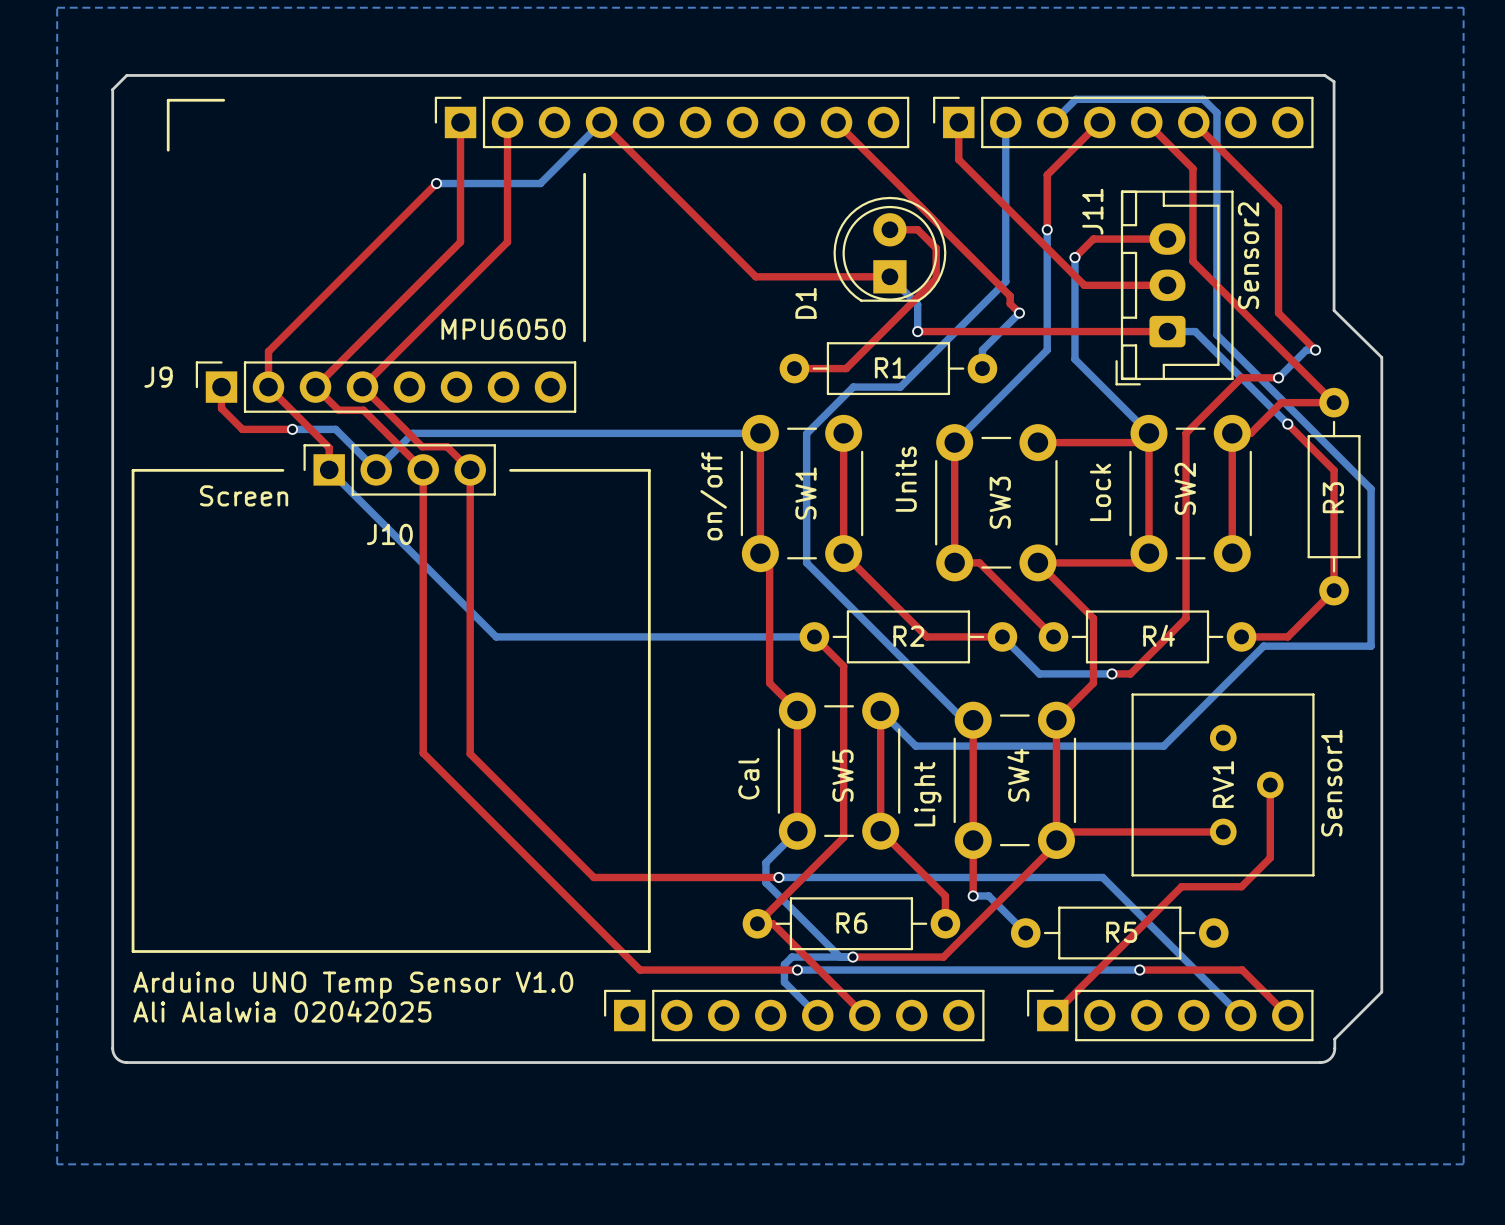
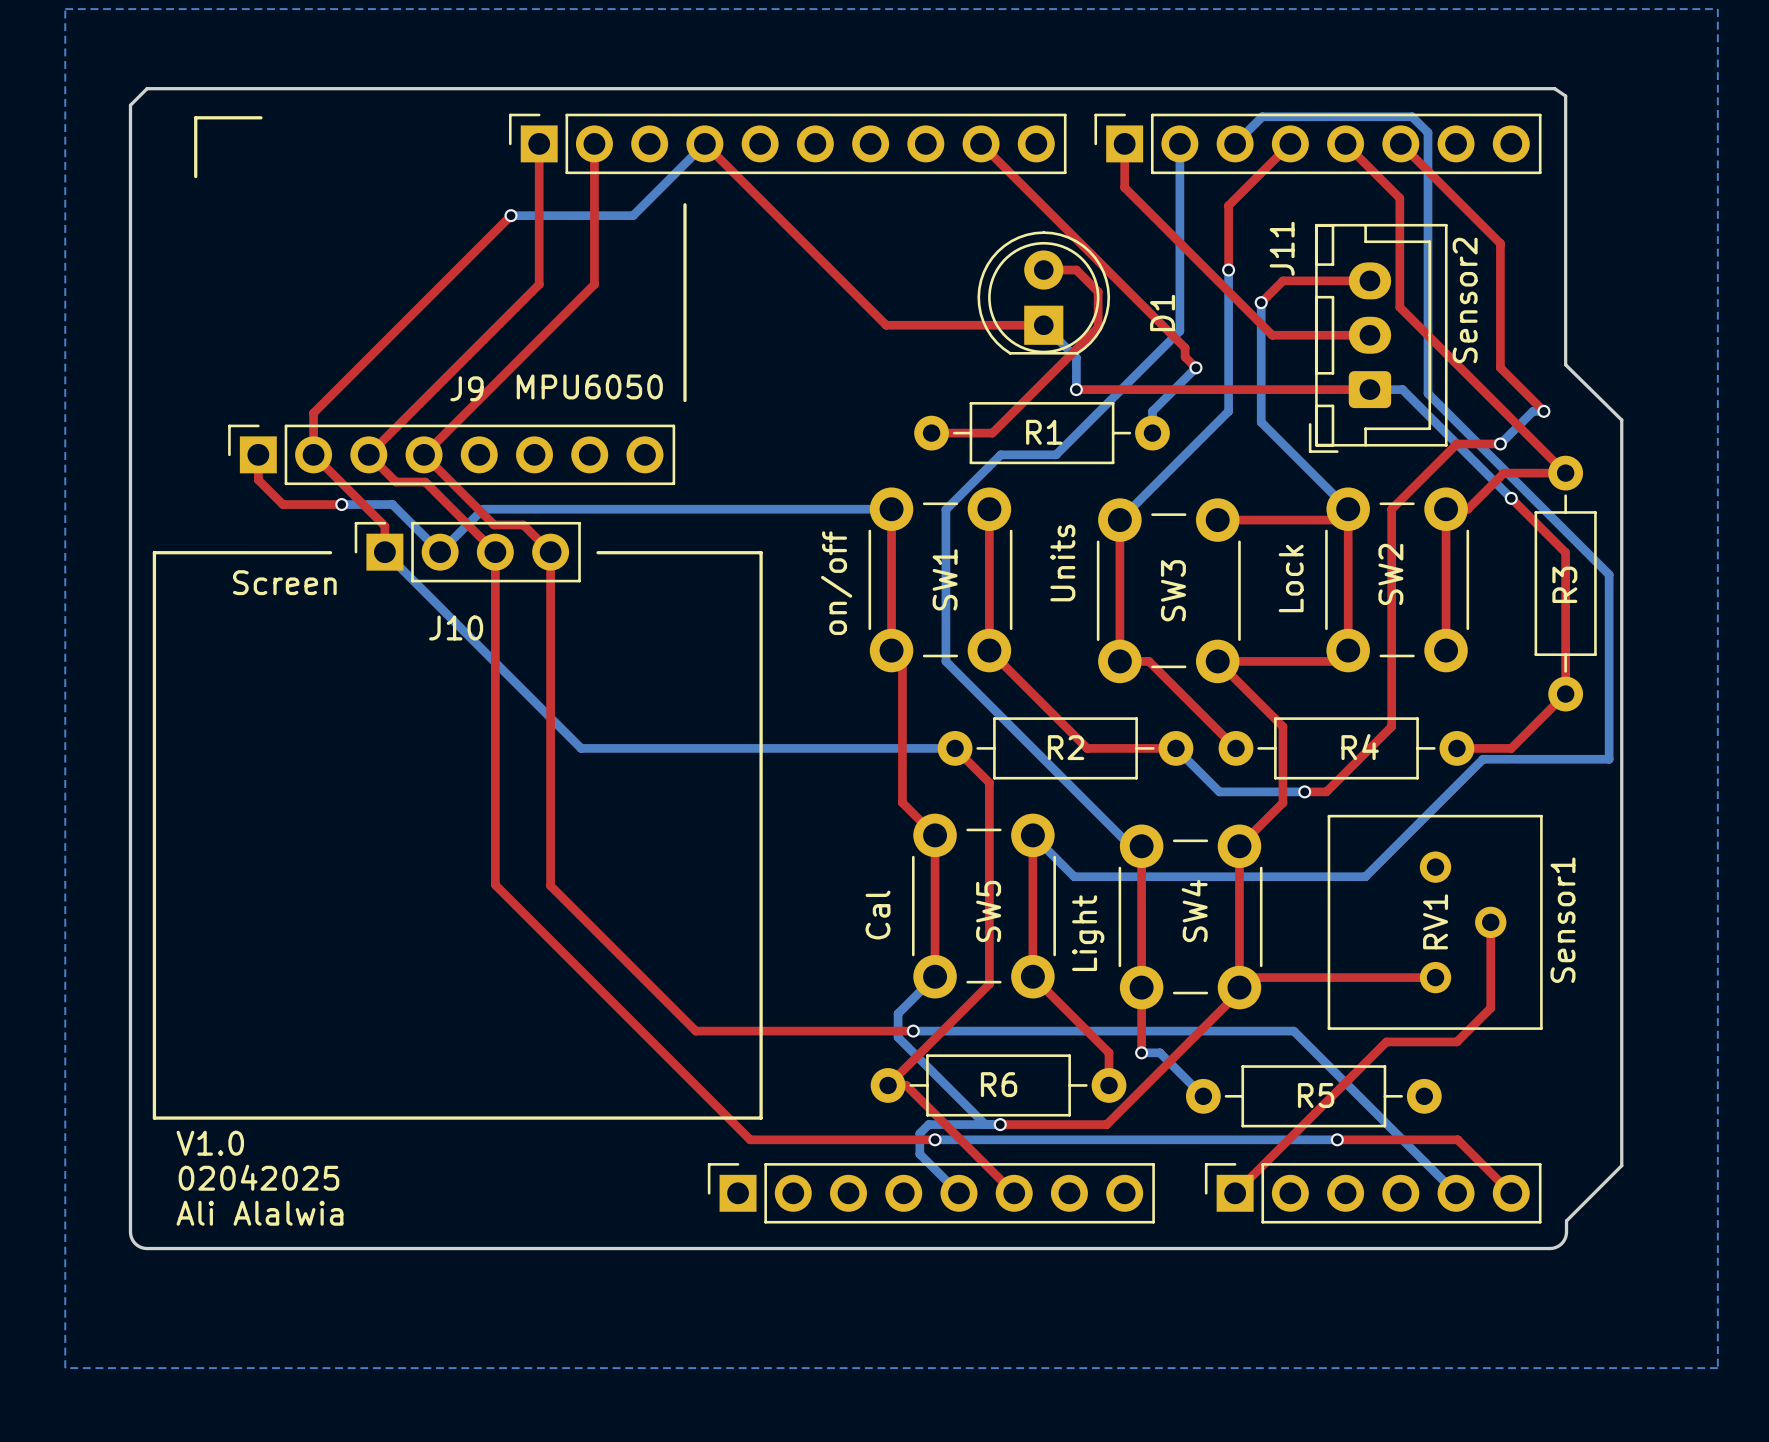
D1 name position: D1 (805, 303) -> D1 (1162, 312)
J9 name position: J9 (158, 377) -> J9 (467, 388)
text: none -> V1.0 (210, 1143)
text: Arduino UNO Temp Sensor V1.0 (353, 985) -> none
text: none -> 02042025 (258, 1177)
text: Ali Alalwia 02042025 (282, 1011) -> Ali Alalwia (260, 1213)

